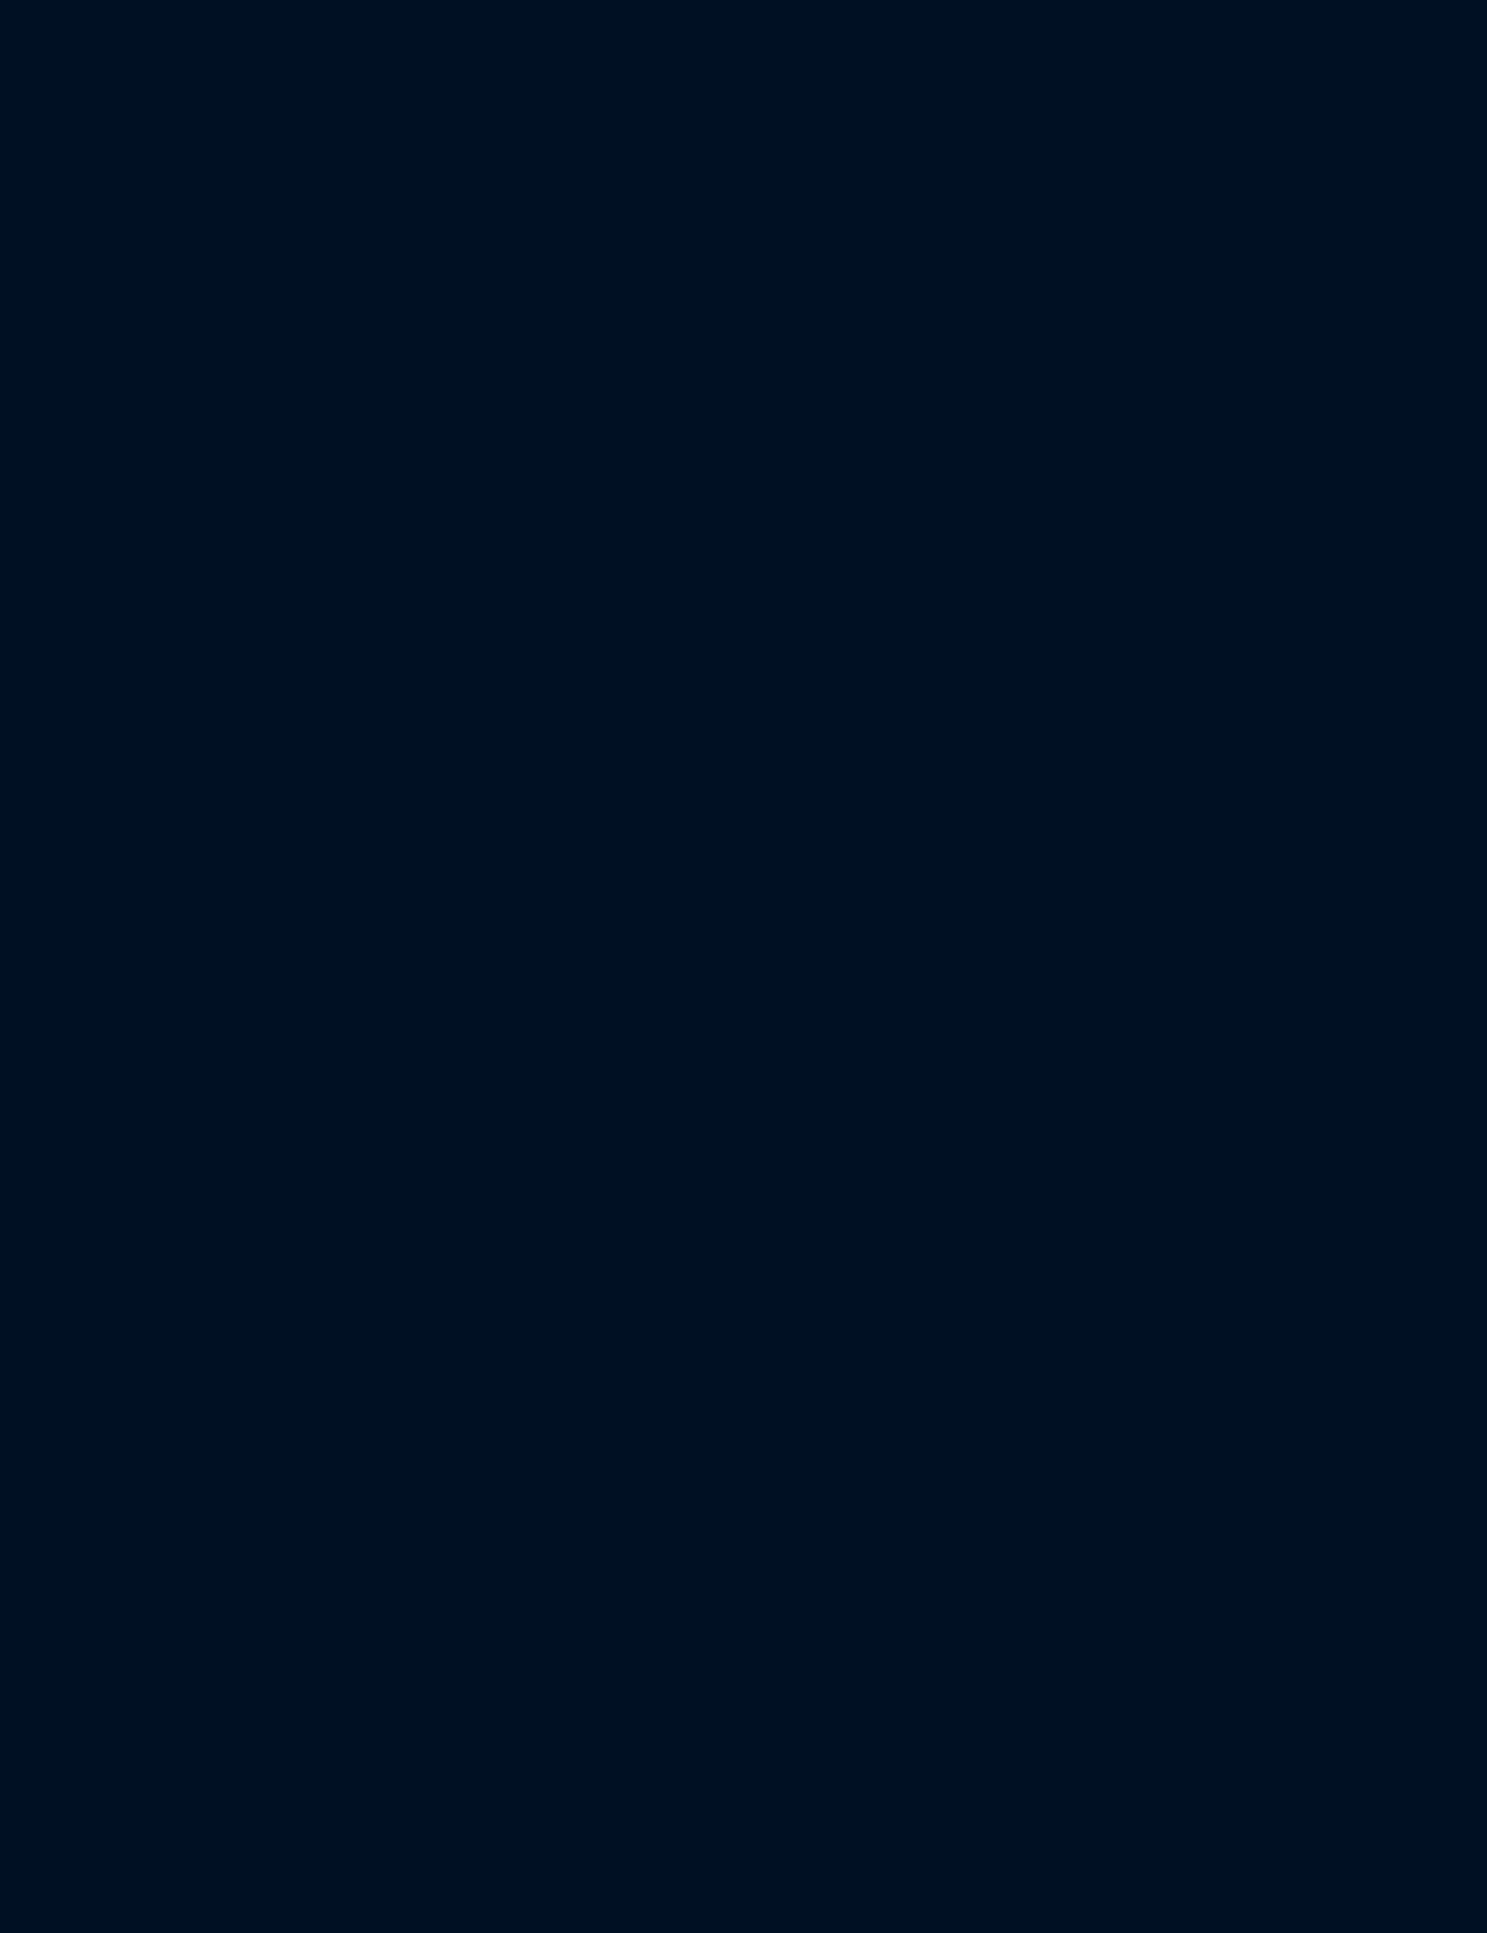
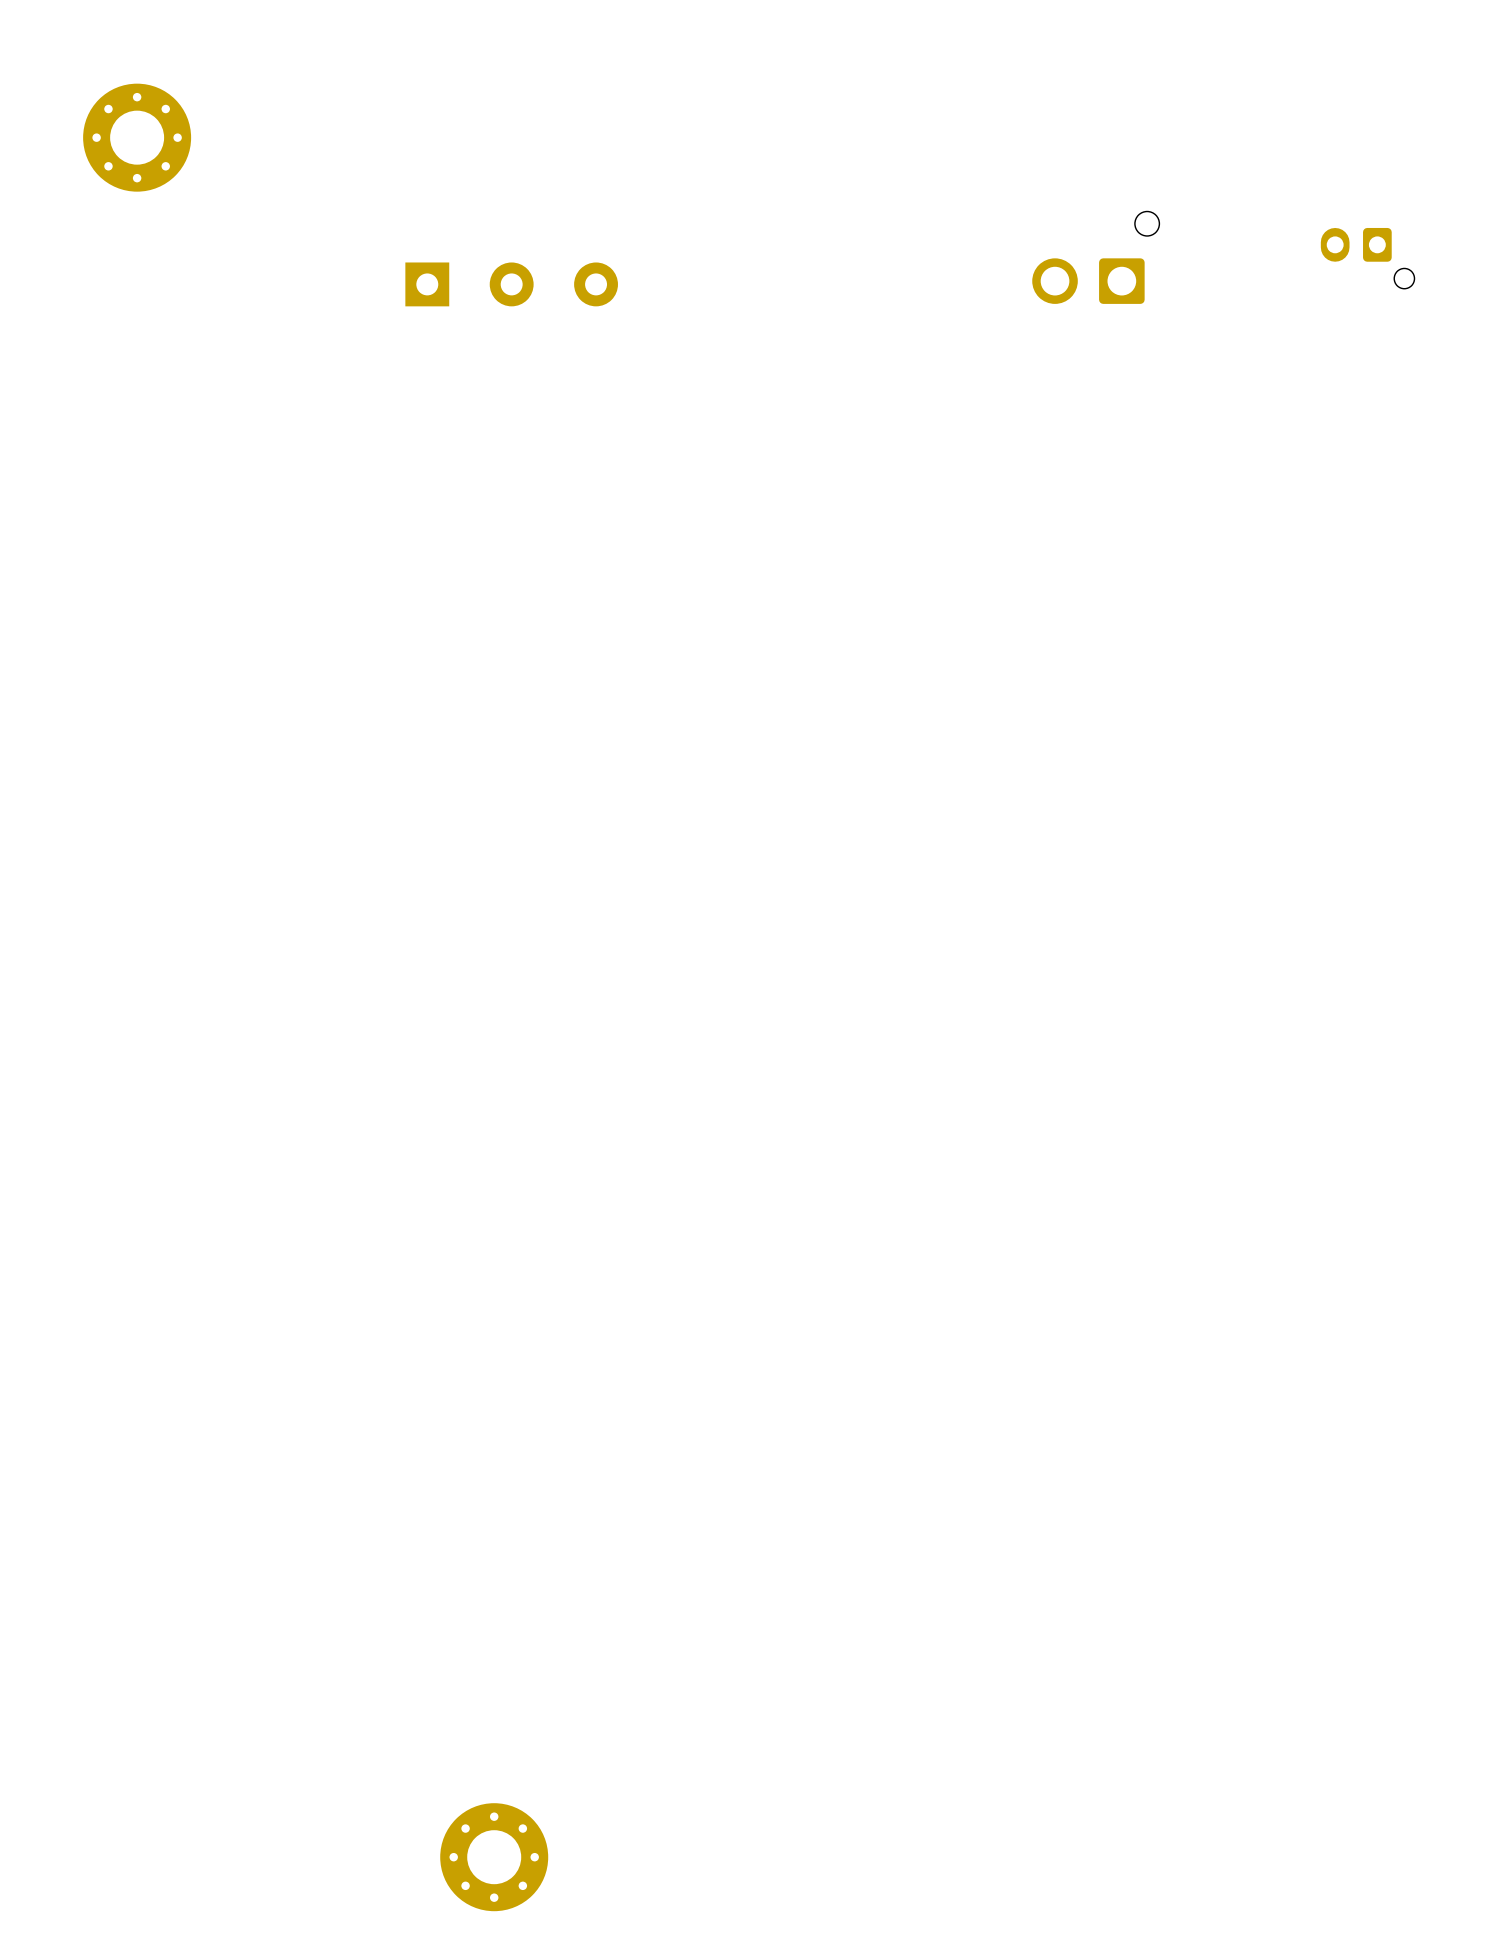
part: none -> (137, 137)
part: none -> (1095, 257)
part: none -> (1367, 258)
part: none -> (511, 284)
part: none -> (494, 1857)

